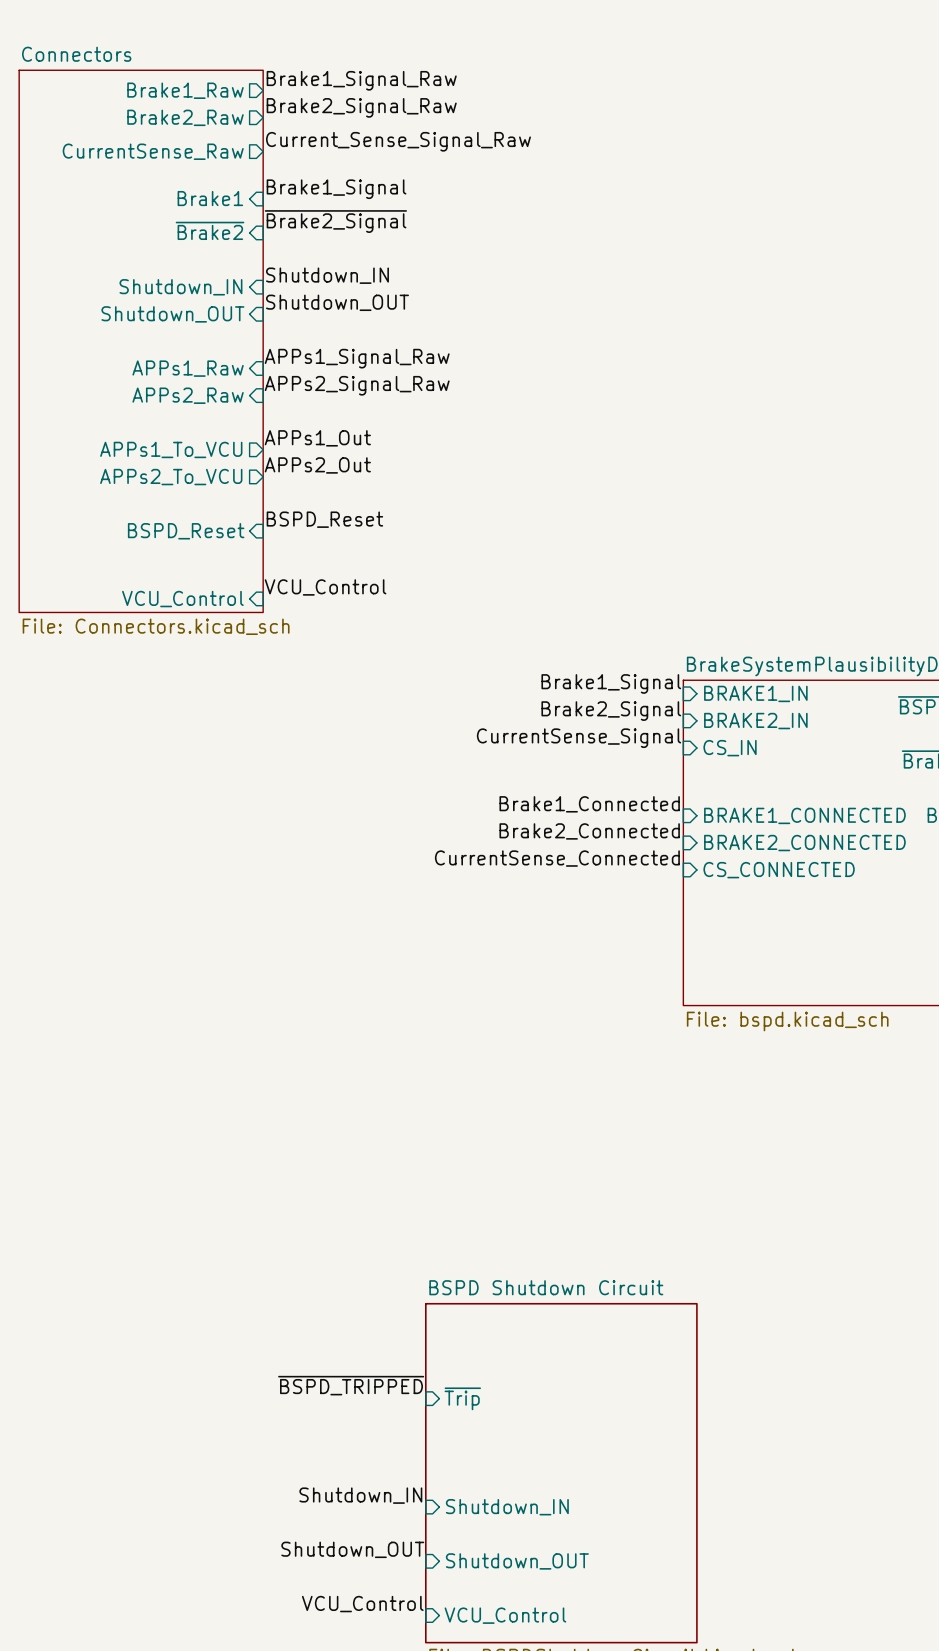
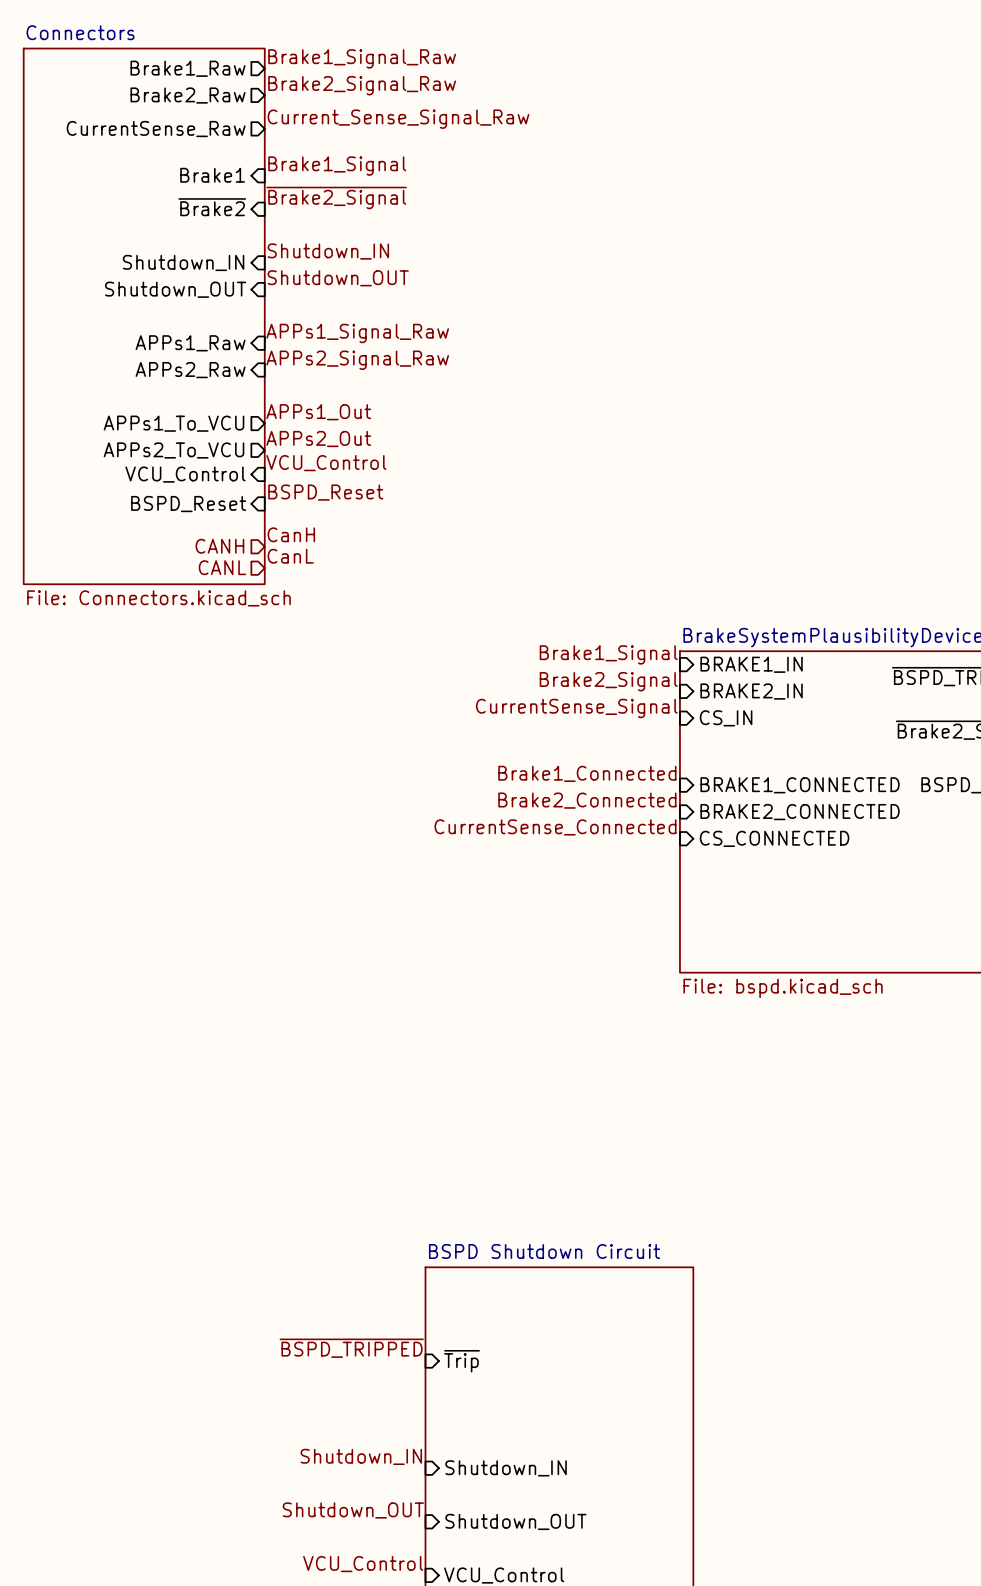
label: none -> CanH (291, 534)
hierarchical label: none -> CANH (219, 546)
label: none -> CanL (290, 556)
label position: VCU_Control (325, 587) -> VCU_Control (326, 463)
hierarchical label: none -> CANL (222, 567)
sheet pin position: VCU_Control (182, 599) -> VCU_Control (185, 474)

